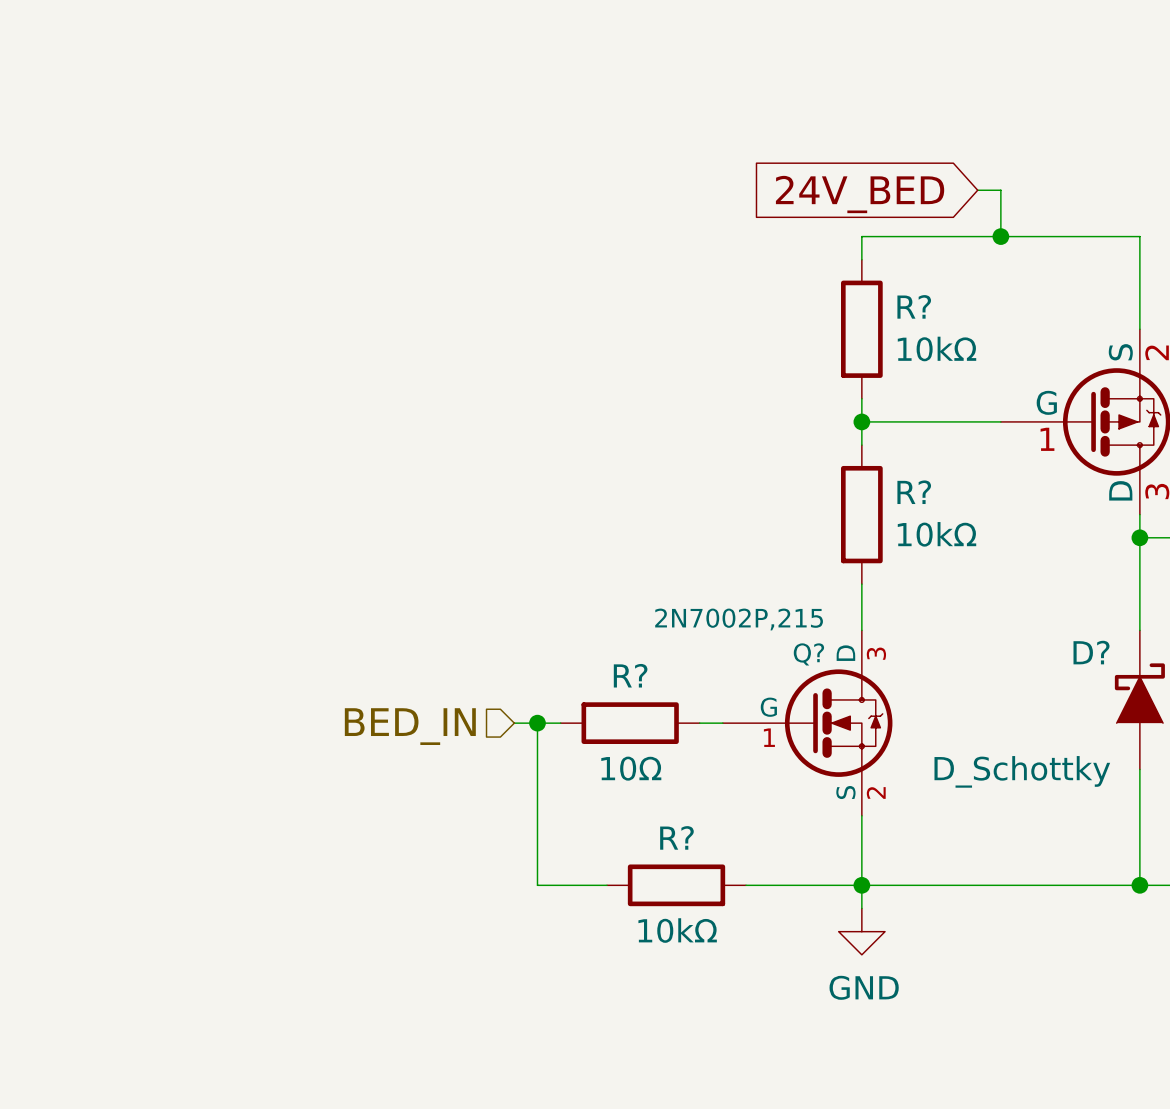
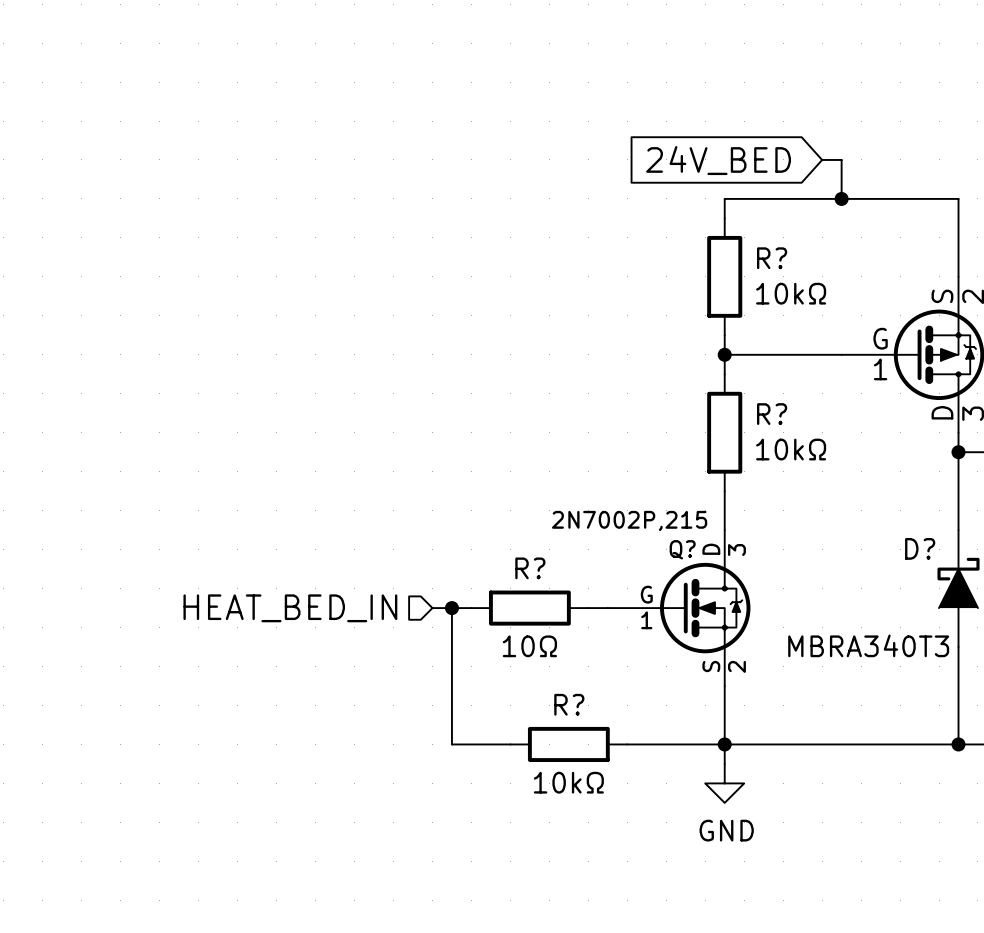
hierarchical label: BED_IN (410, 726) -> HEAT_BED_IN (290, 608)
D? value: D_Schottky (1022, 771) -> MBRA340T3 (868, 645)

